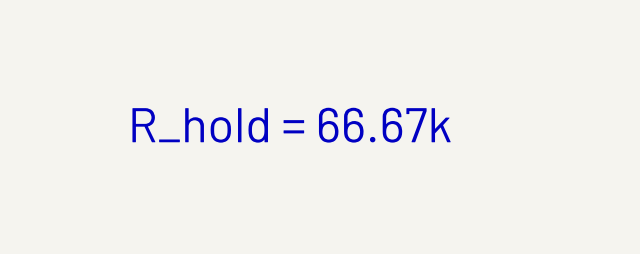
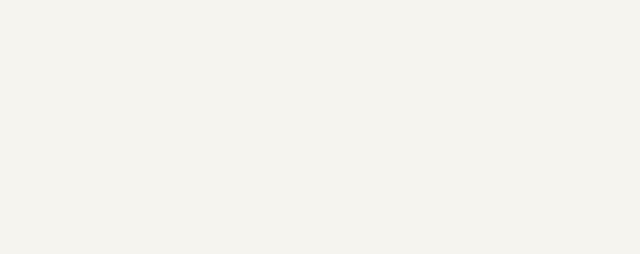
text: R_hold = 66.67k (291, 125) -> none

